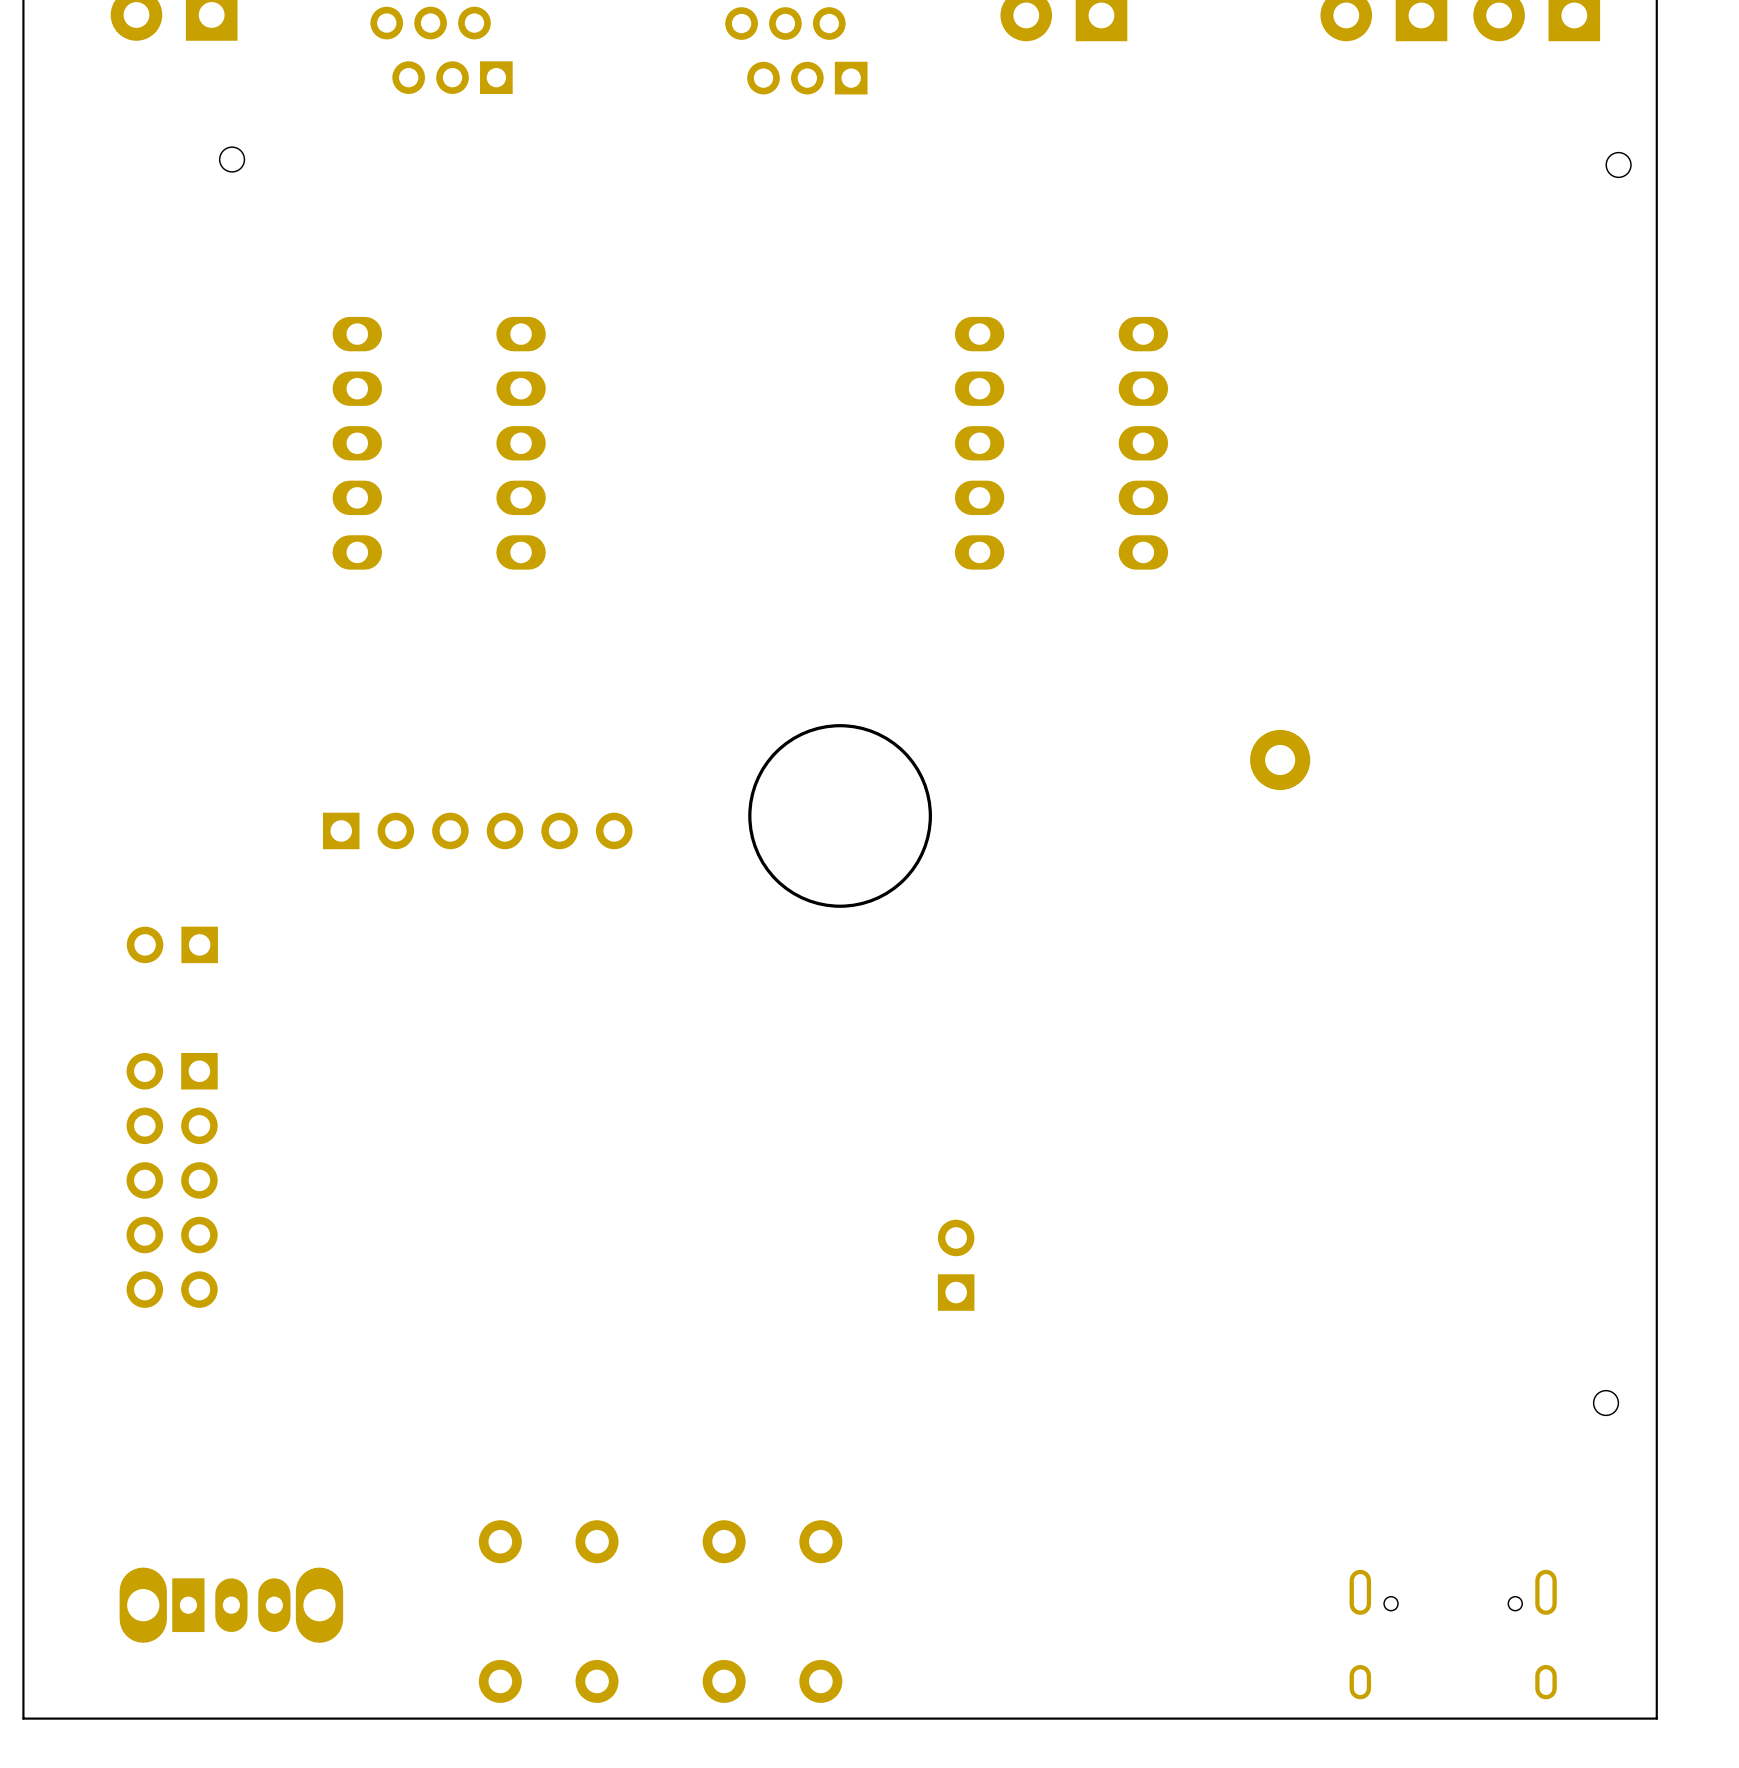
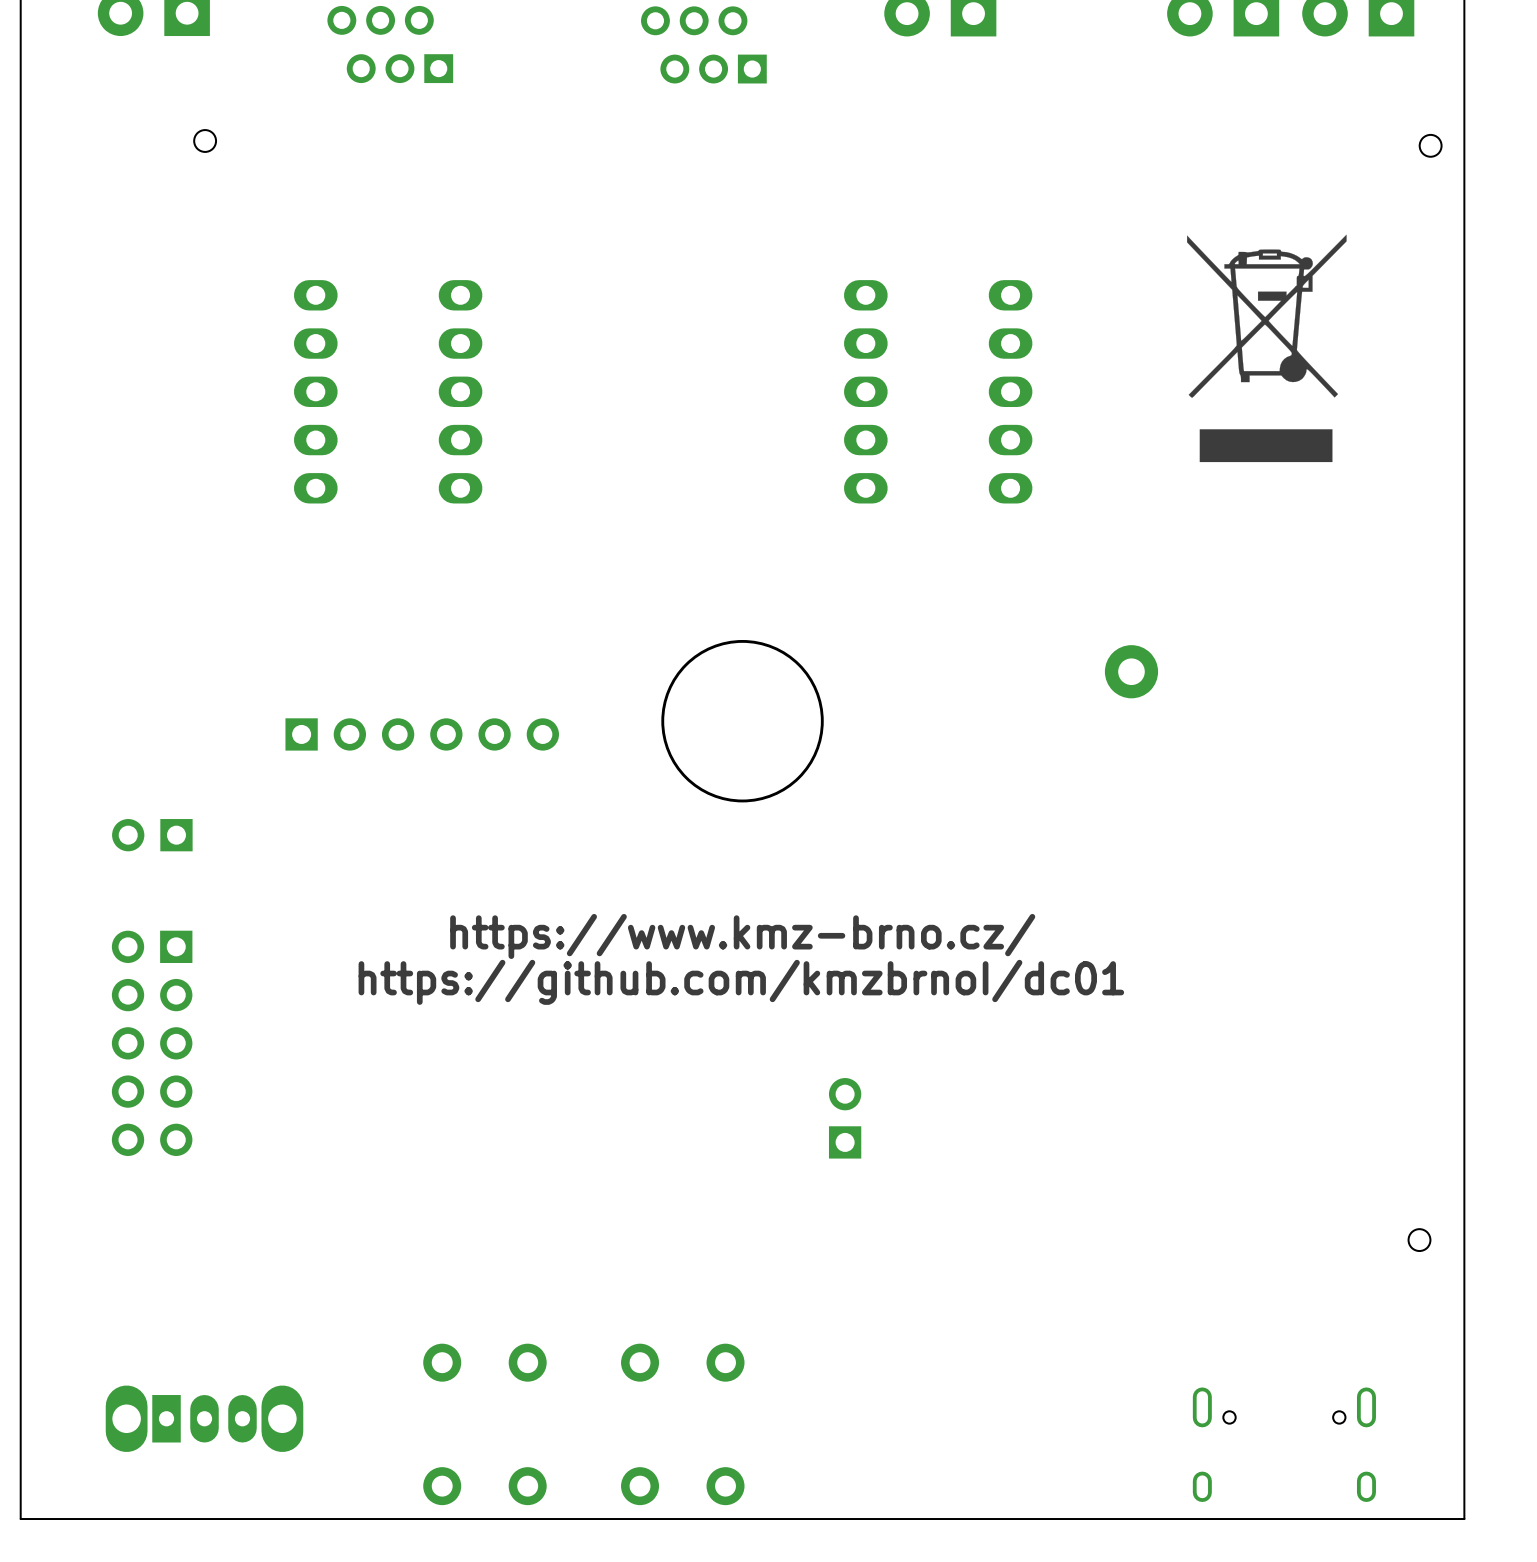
drawing: none -> [1187, 234, 1347, 463]
text: none -> https://www.kmz-brno.cz/ (742, 936)
text: none -> https://github.com/kmzbrnoI/dc01 (741, 982)

